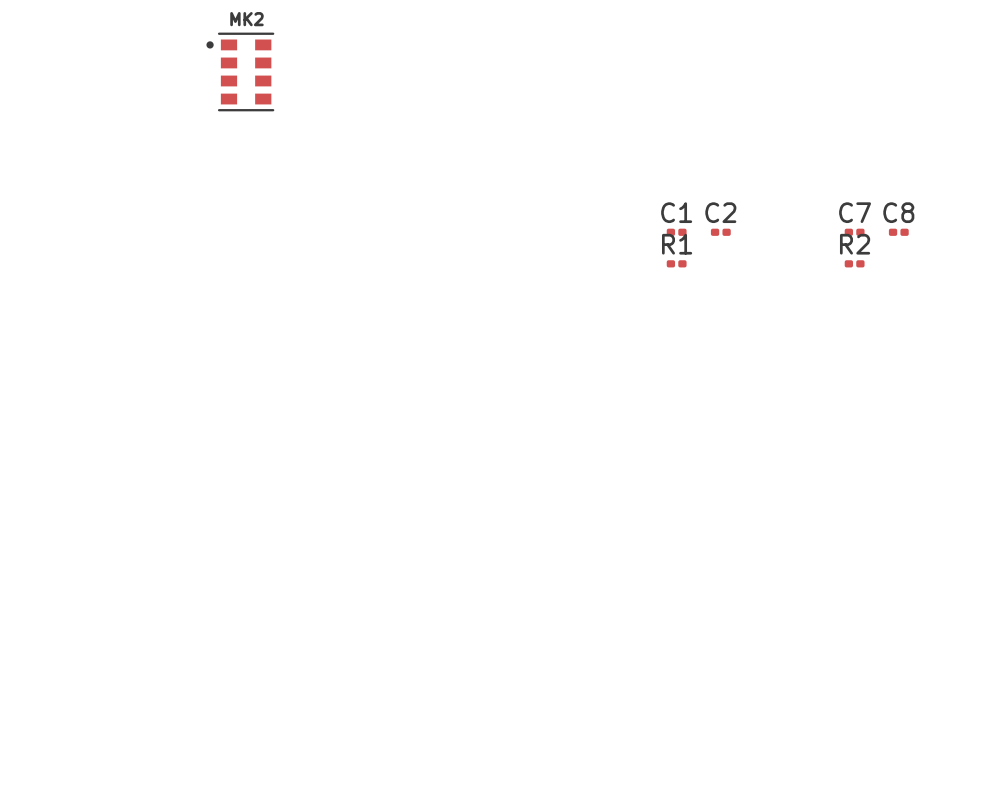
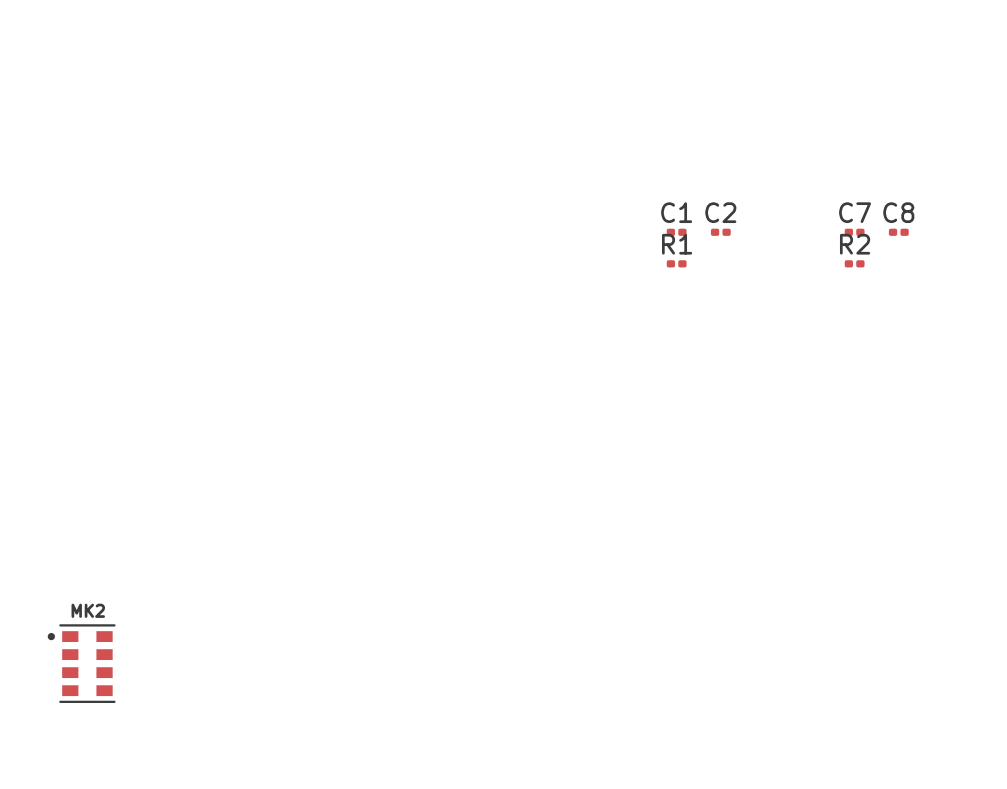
MK2 position: (240, 71) -> (81, 663)

